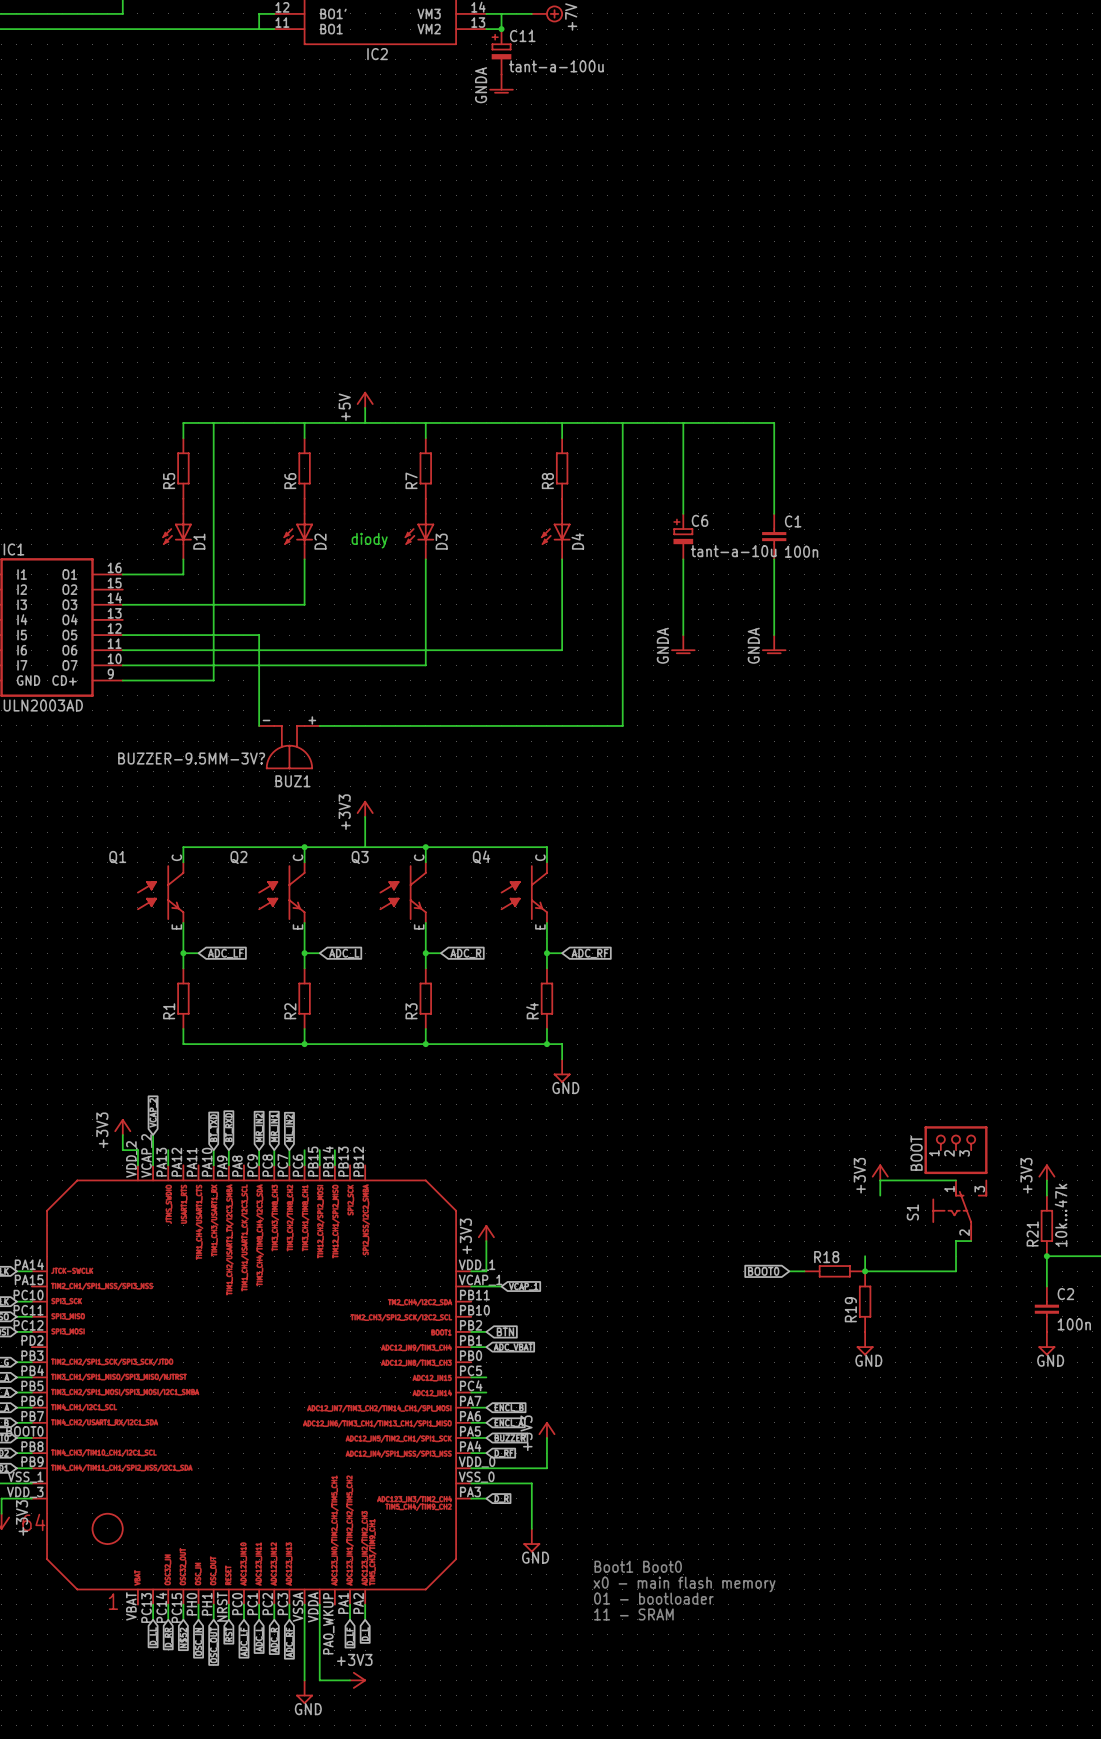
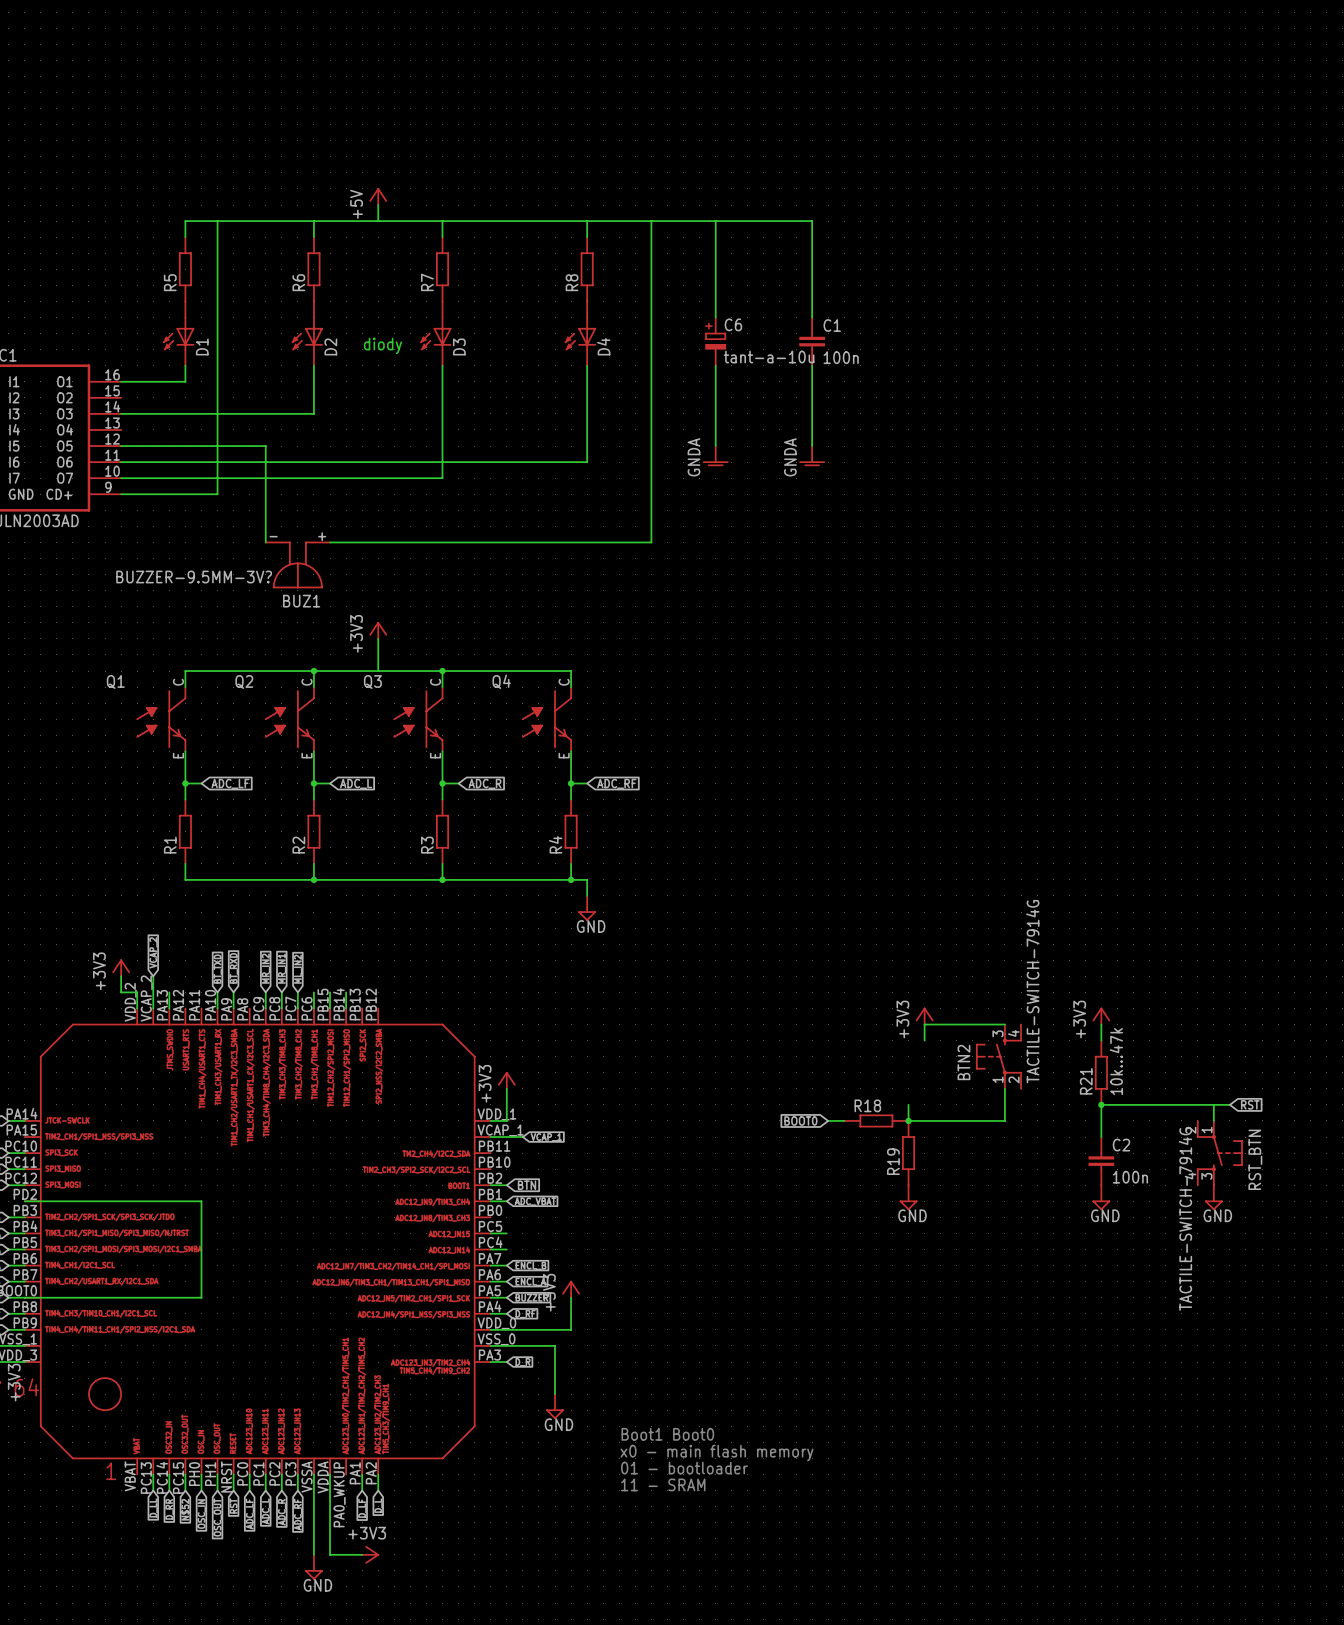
BOOT: (956, 1150) -> none
BTN2: none -> TACTILE-SWITCH-7914G (998, 1056)
S1: (959, 1210) -> none
wire: (956, 1241) (971, 1241) -> none
wire: none -> (24, 1201) (201, 1201) (201, 1297) (24, 1297)

